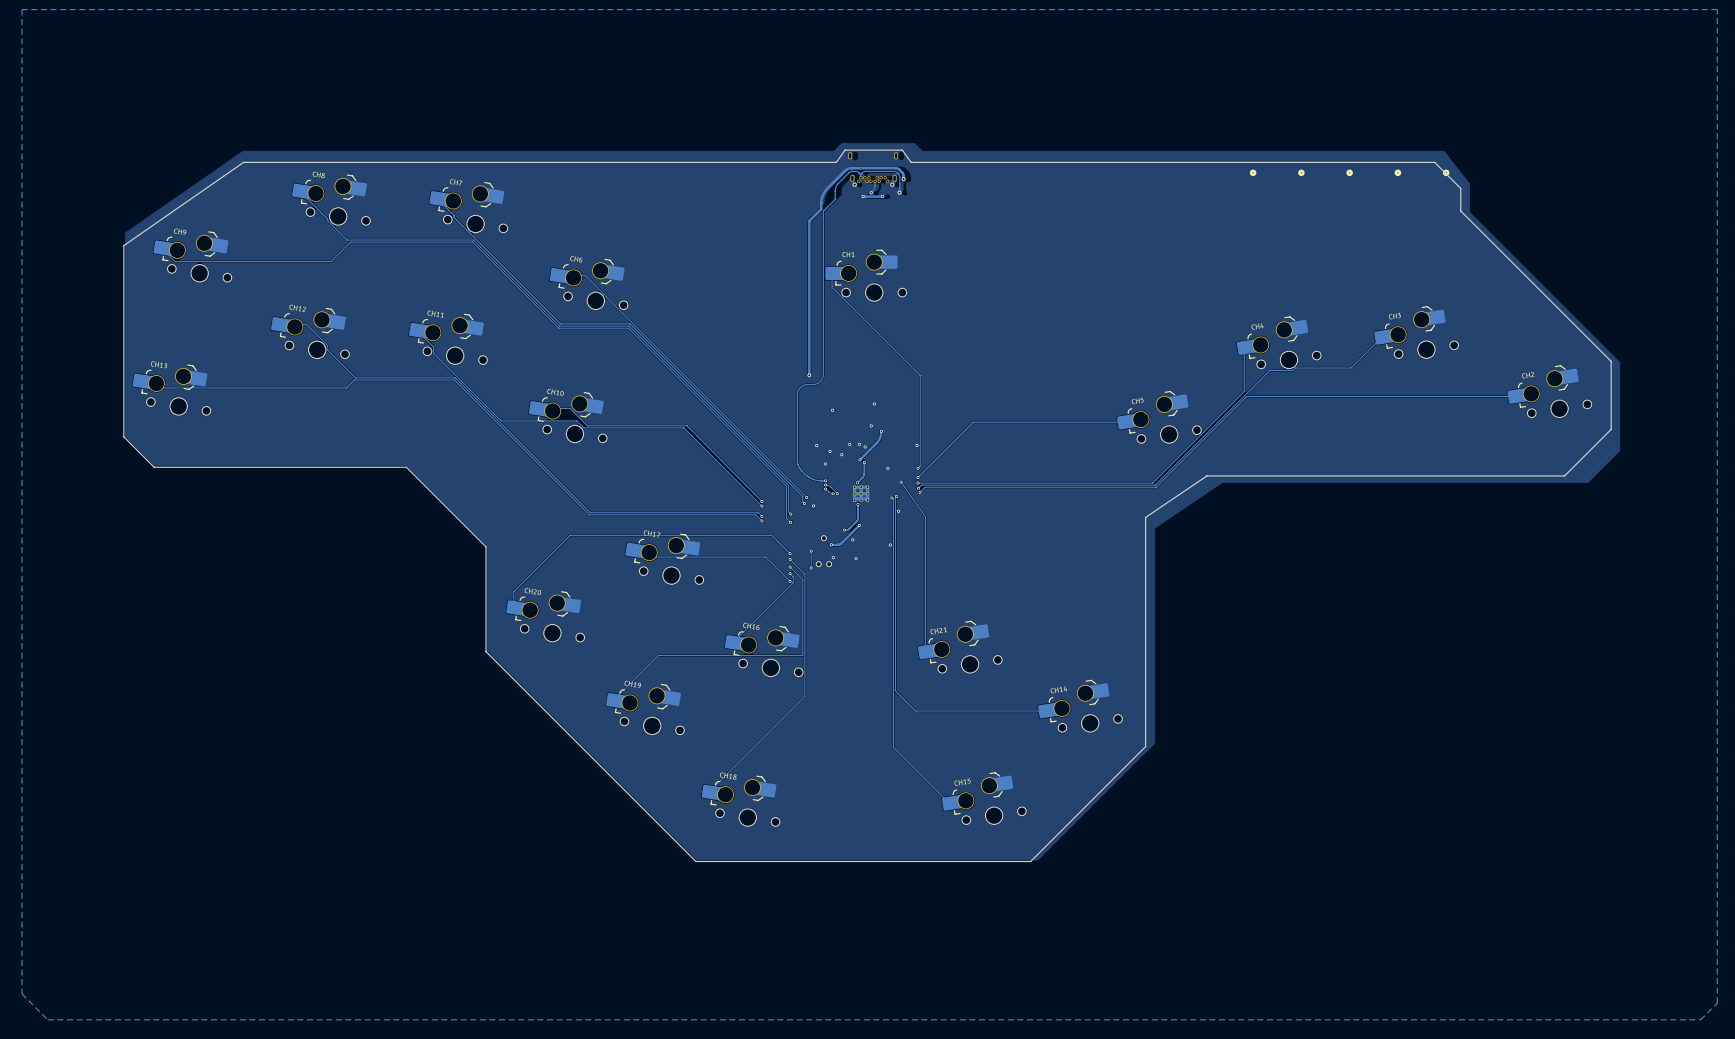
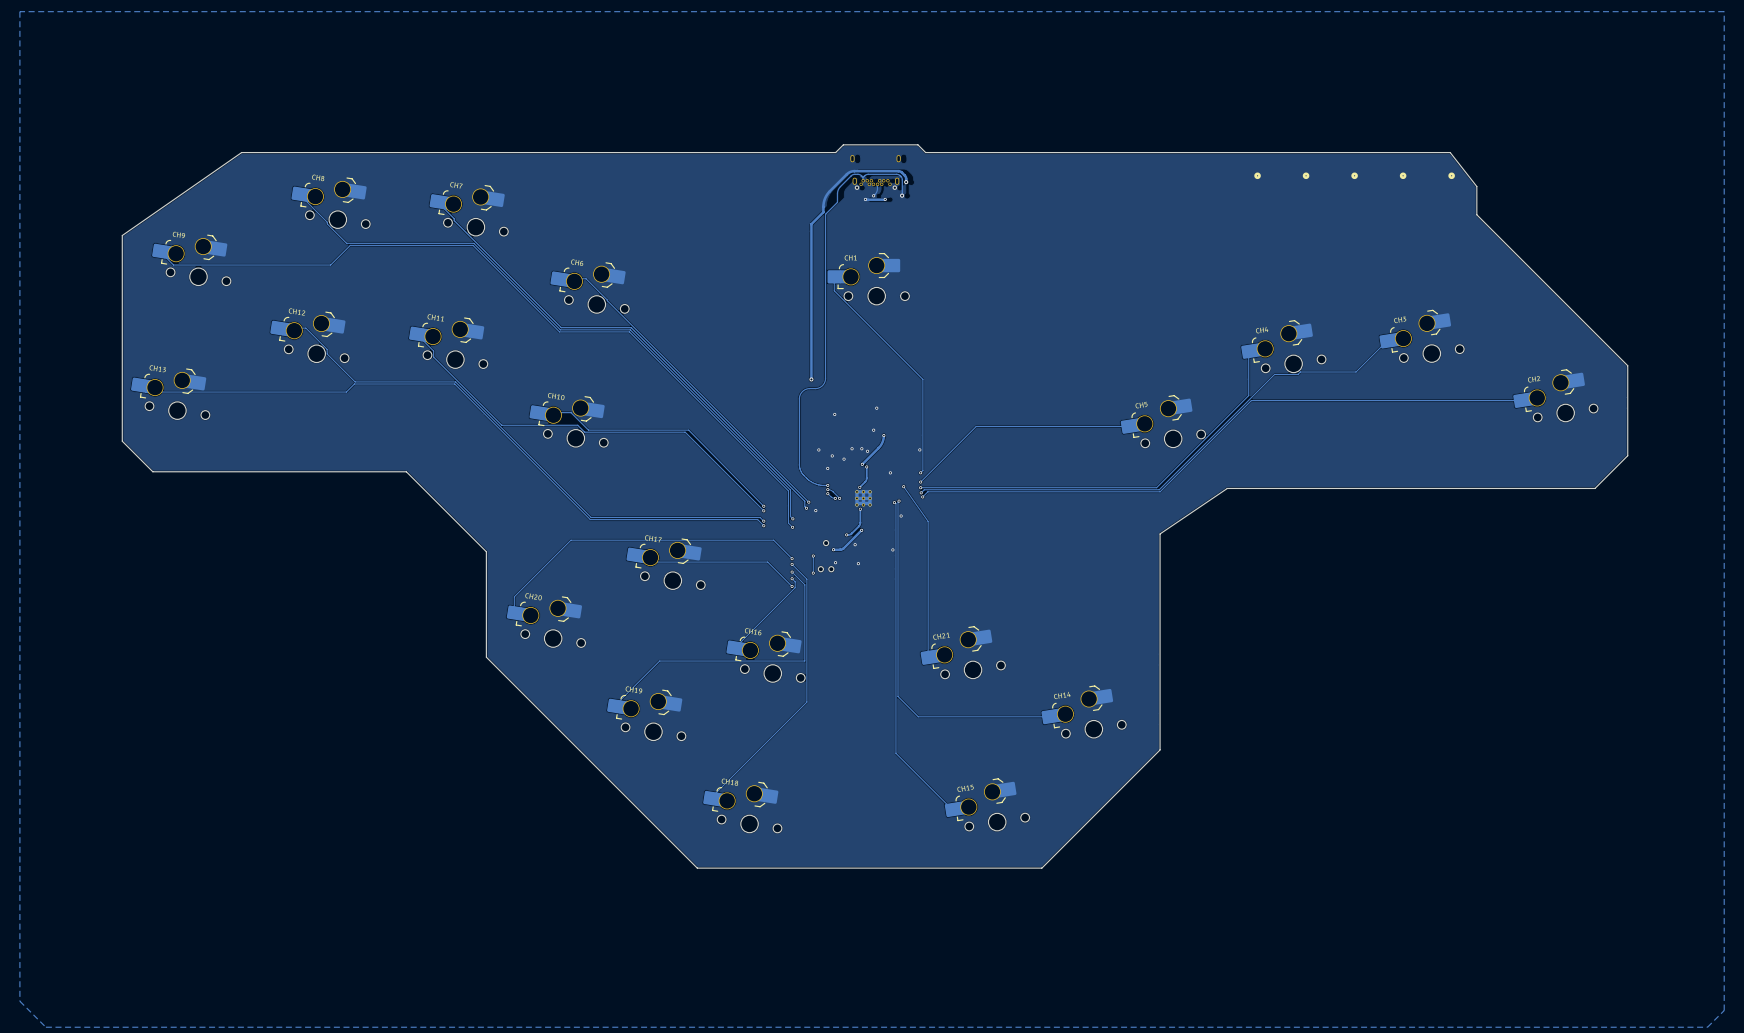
board edge: (123, 245) (243, 162) (836, 162) (845, 150) (902, 150) (911, 162) (1434, 162) (1460, 188) (1460, 210) (1611, 361) (1611, 429) (1564, 475) (1206, 475) (1145, 517) (1145, 746) (1030, 861) -> (122, 248) (122, 235) (241, 152) (835, 152) (843, 144) (917, 144) (925, 152) (1450, 152) (1476, 186) (1476, 214) (1627, 365) (1627, 455) (1595, 488) (1227, 488) (1160, 533) (1160, 749) (1041, 868) (1033, 868)

